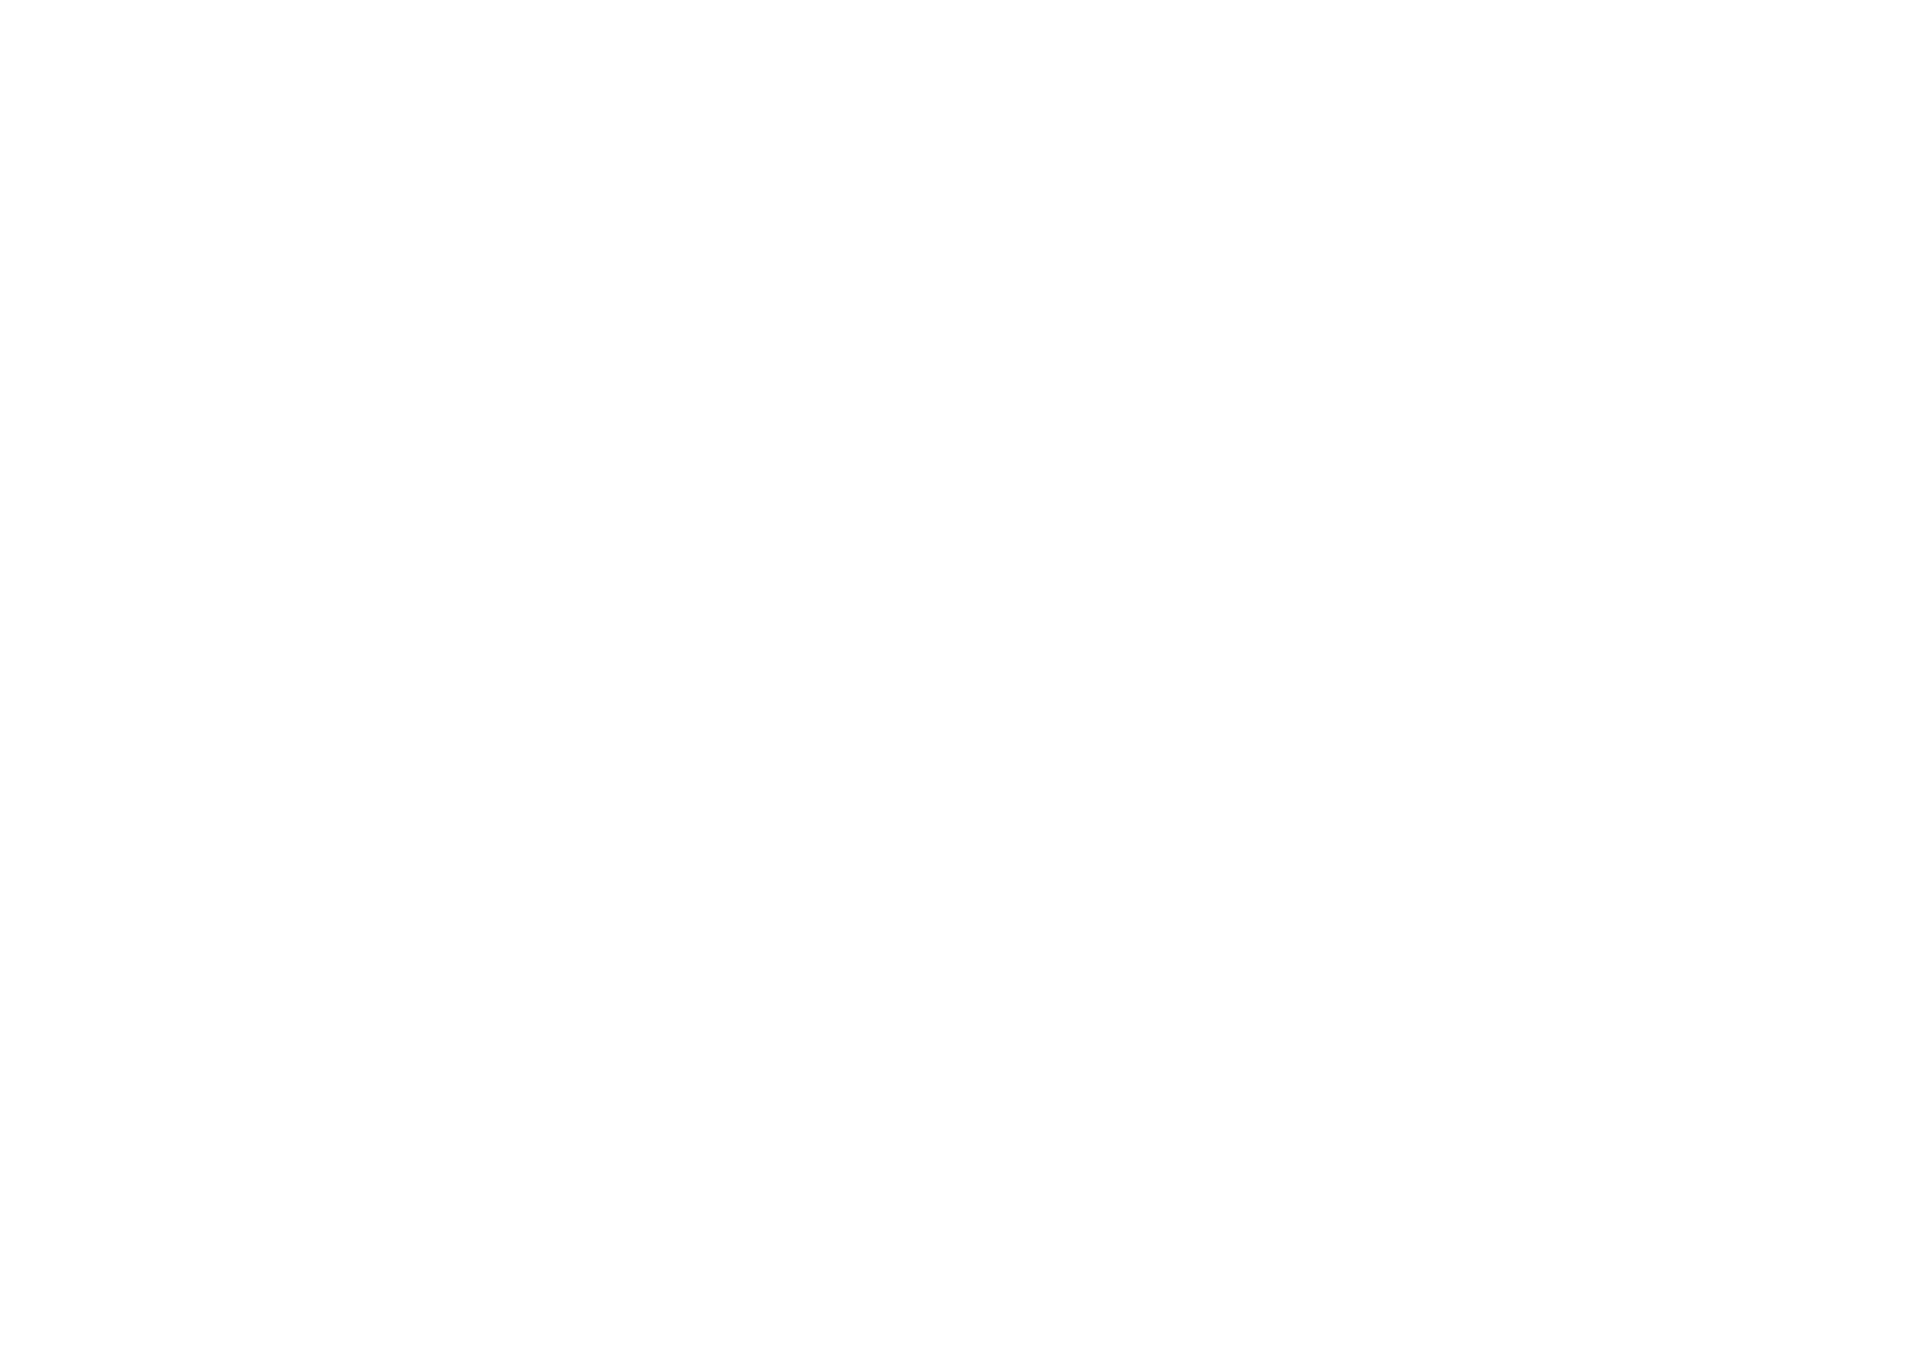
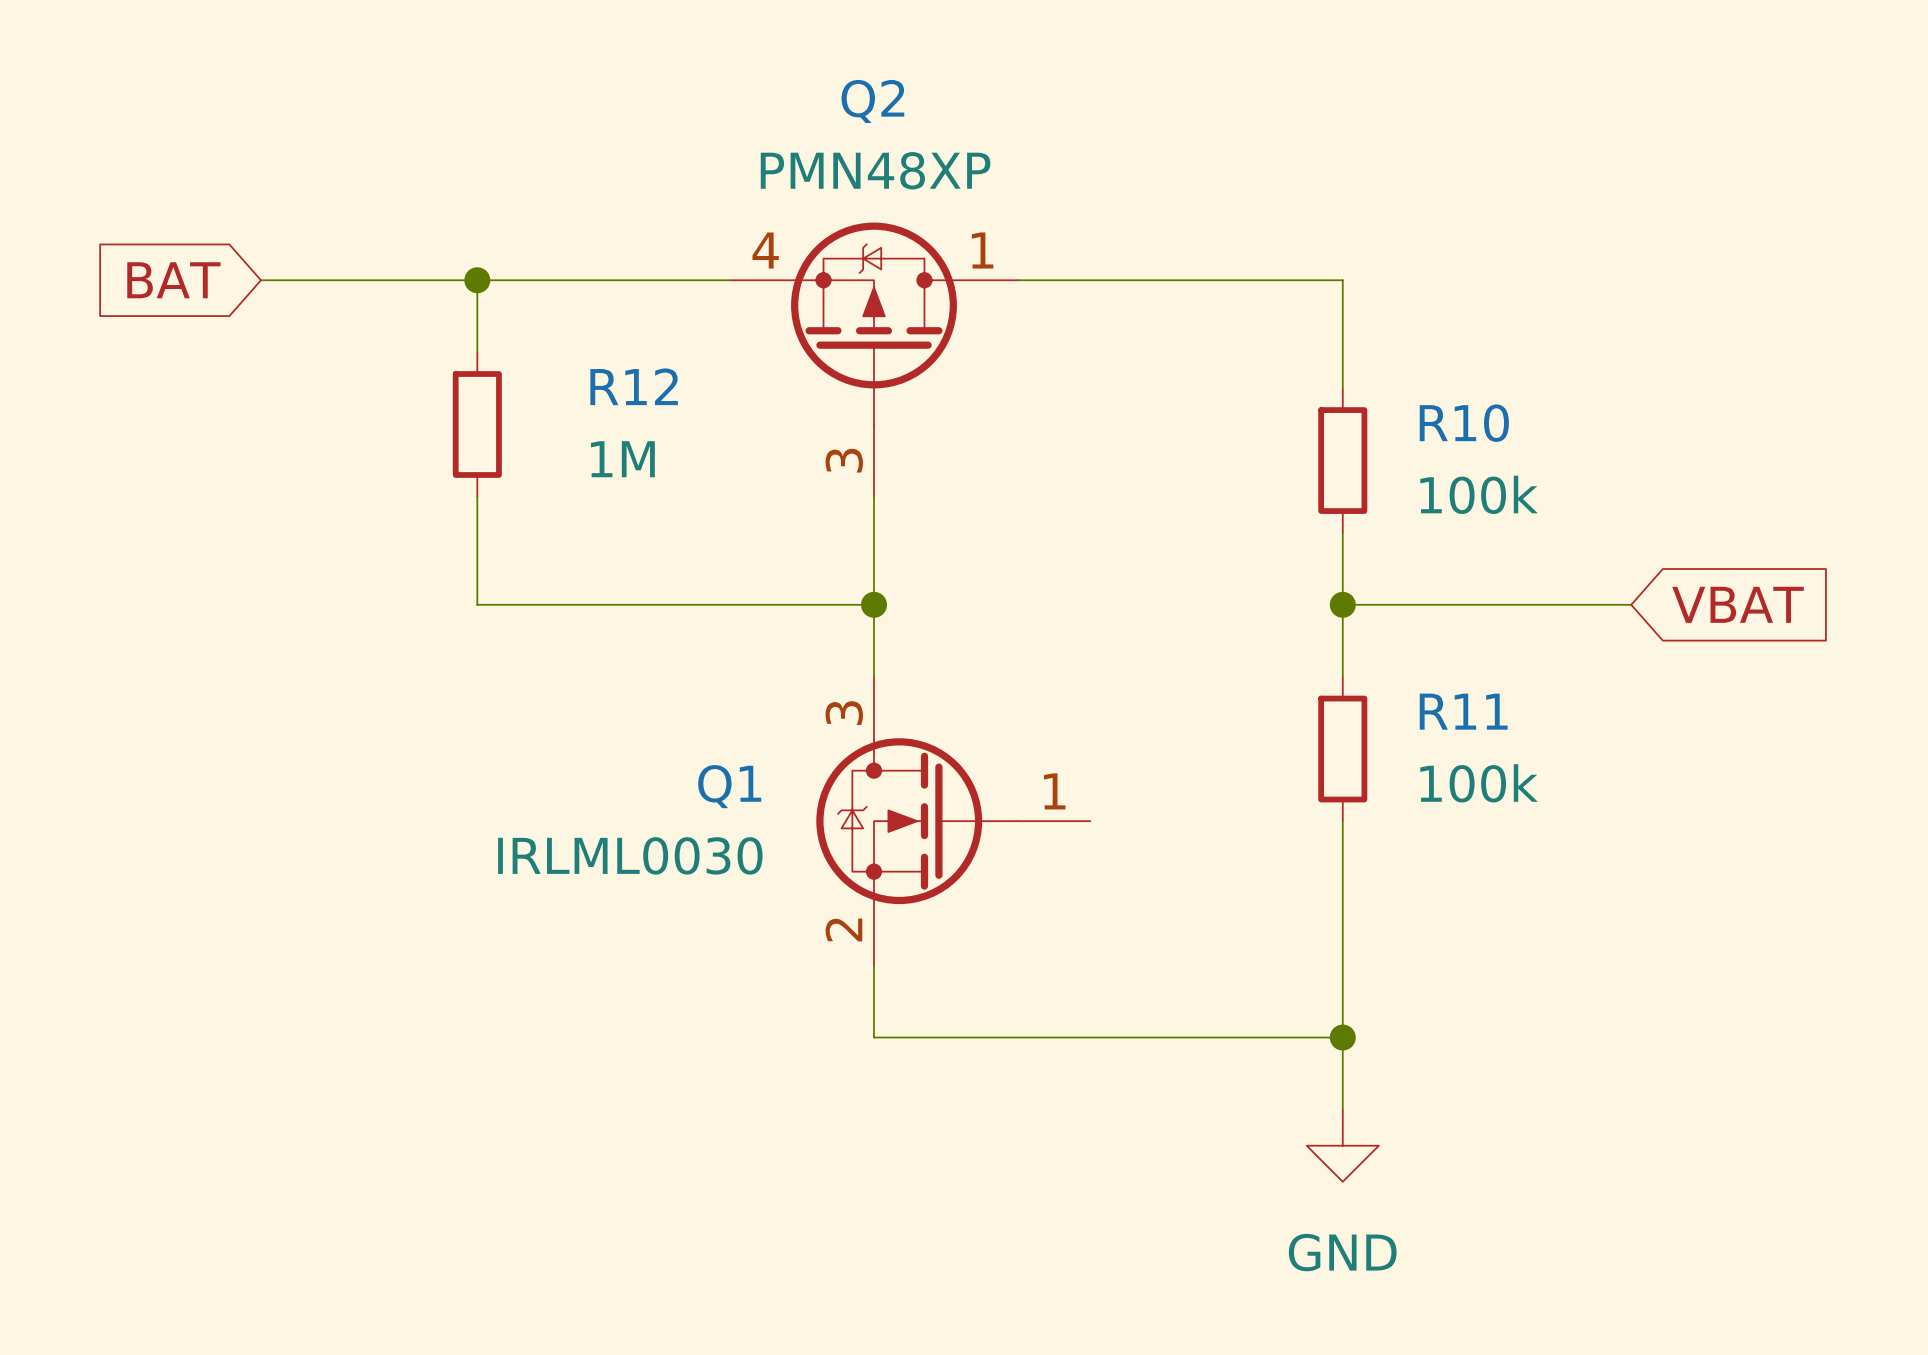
global label: none -> BAT (173, 280)
wire: none -> (260, 280) (729, 280)
wire: none -> (477, 280) (477, 352)
junction: none -> (477, 280)
wire: none -> (1018, 280) (1342, 280) (1342, 388)
Q2: none -> PMN48XP (873, 359)
R12: none -> 1M (477, 424)
R10: none -> 100k (1342, 460)
wire: none -> (477, 496) (477, 604) (873, 604)
wire: none -> (873, 496) (873, 676)
wire: none -> (1342, 532) (1342, 676)
junction: none -> (873, 604)
wire: none -> (1342, 604) (1631, 604)
junction: none -> (1342, 604)
global label: none -> VBAT (1738, 604)
R11: none -> 100k (1342, 749)
Q1: none -> IRLML0030 (953, 821)
wire: none -> (1342, 821) (1342, 1109)
wire: none -> (873, 965) (873, 1037) (1342, 1037)
junction: none -> (1342, 1037)
power symbol: none -> GND (1342, 1145)

